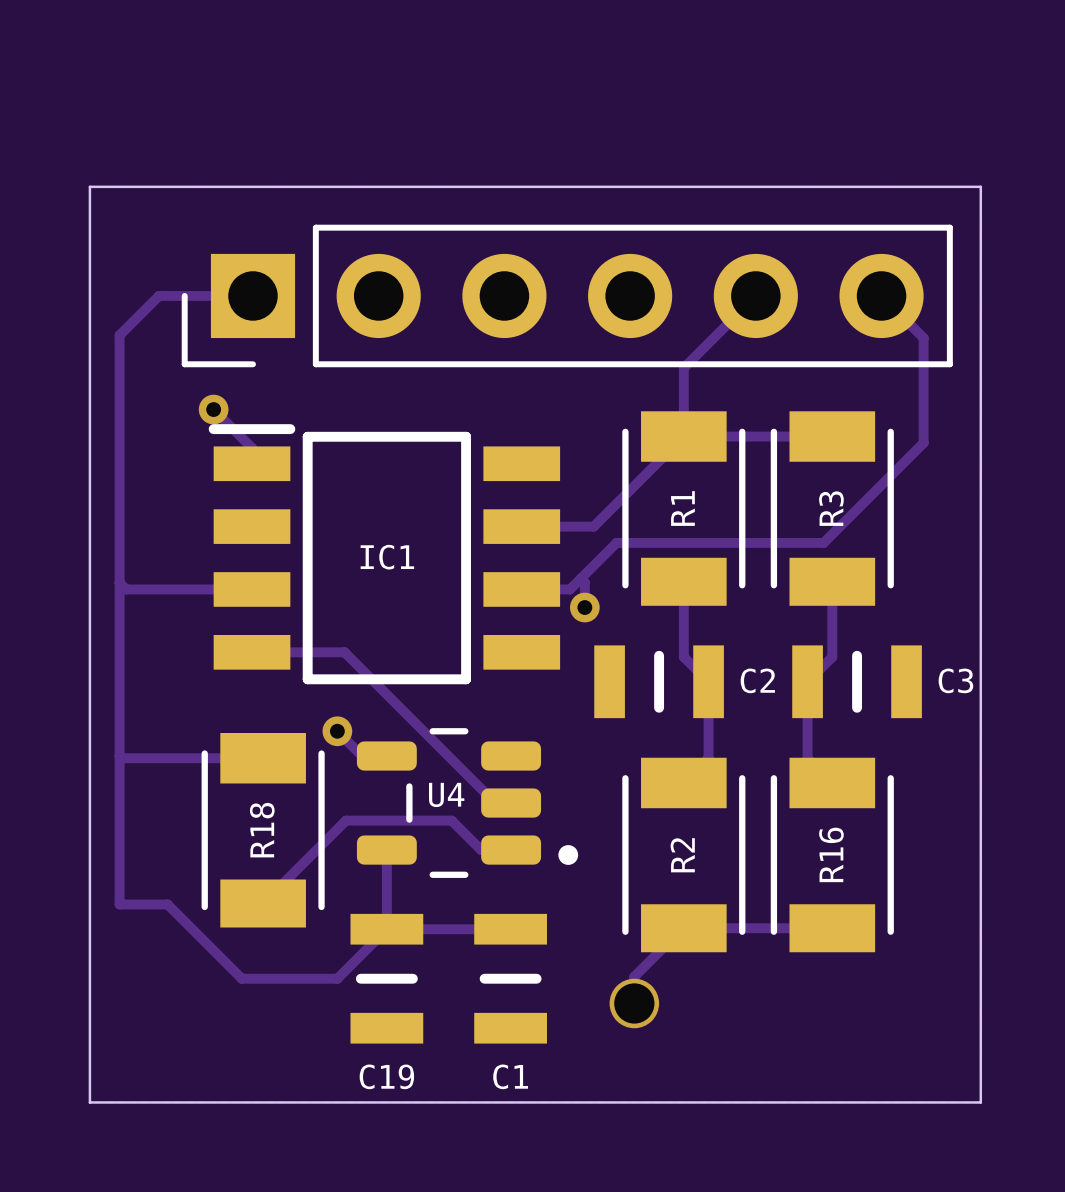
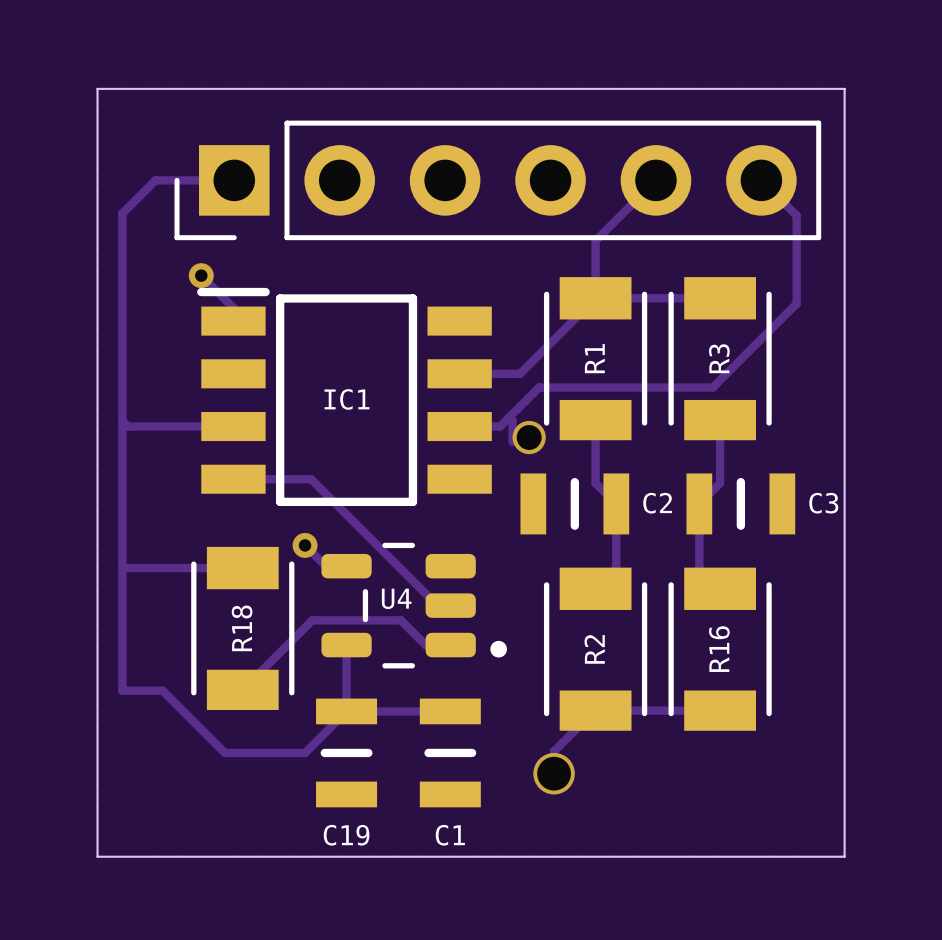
via position: (584, 607) -> (529, 437)

